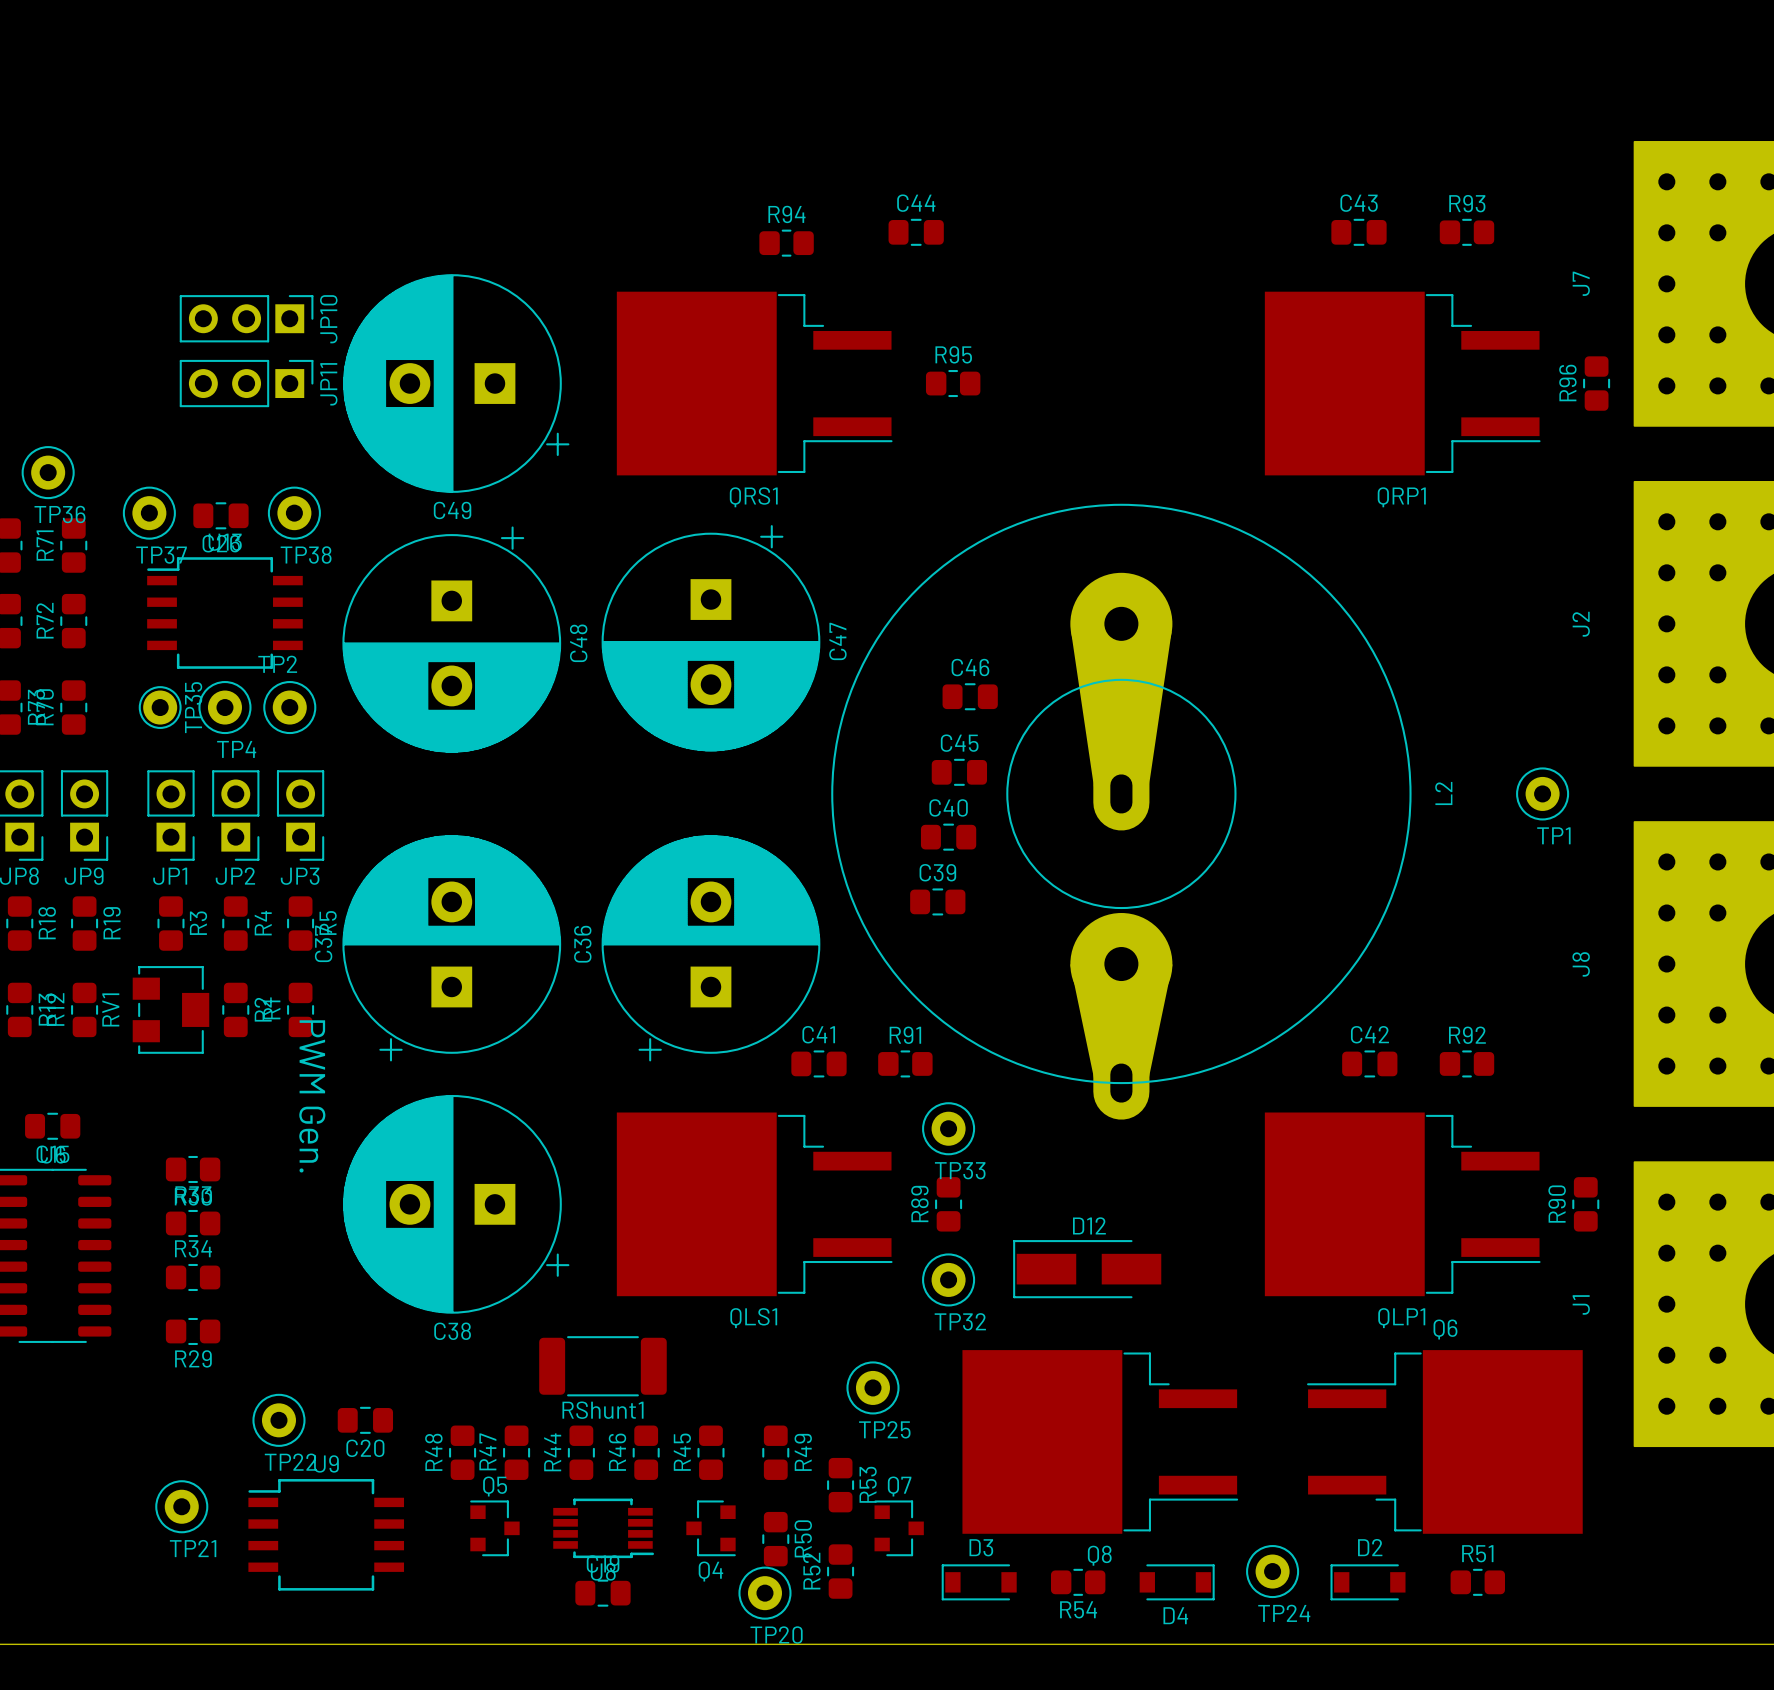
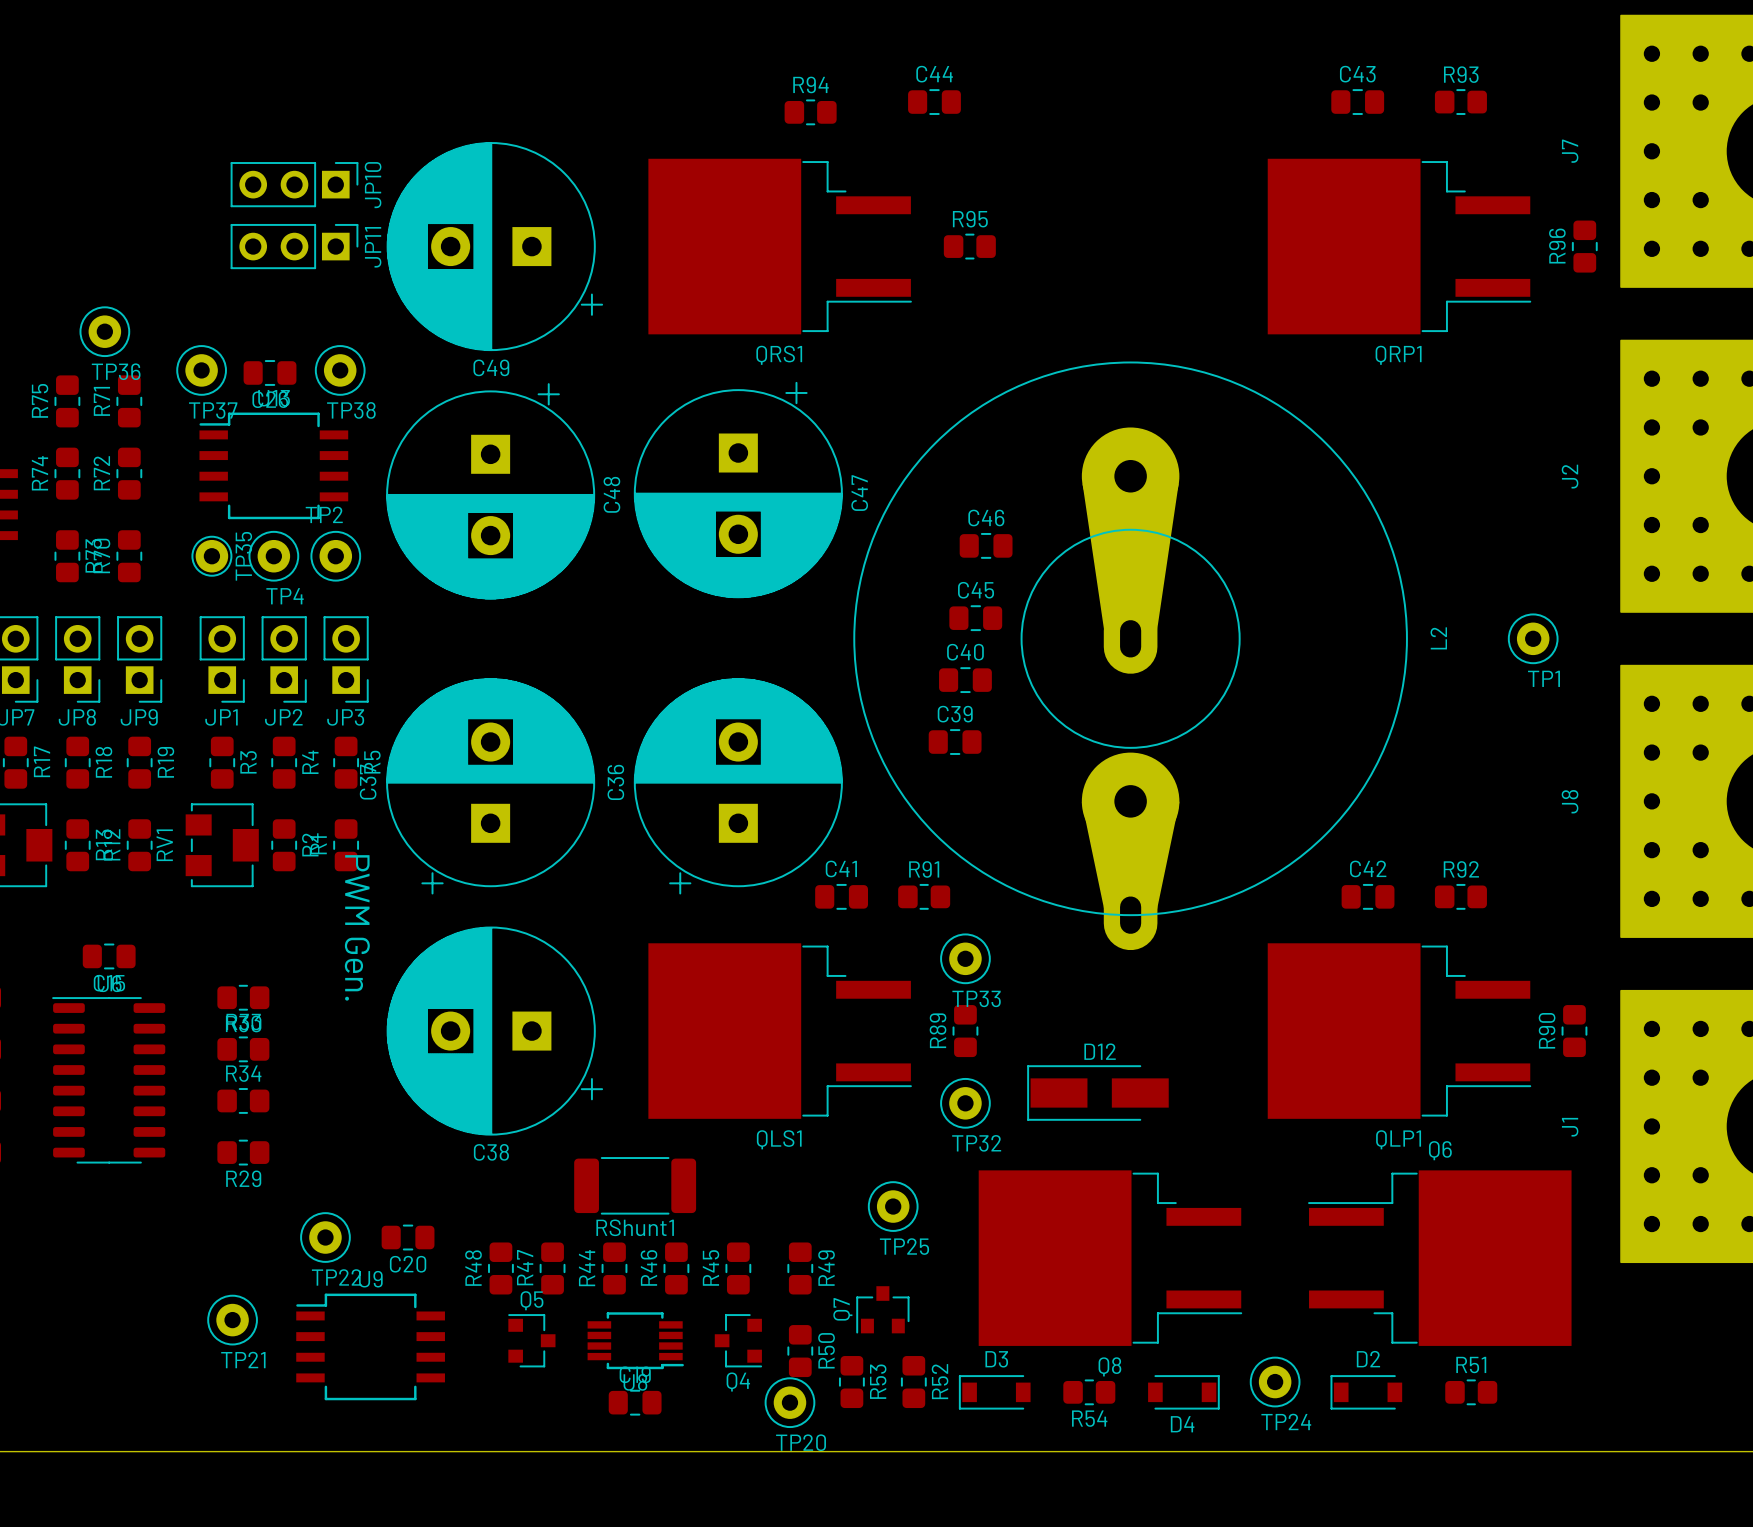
R53 position: (840, 1485) -> (851, 1382)
Q7 rotation: 0° (899, 1528) -> 90° counterclockwise (882, 1309)
Q7 position: (899, 1528) -> (882, 1309)
R52 name position: R52 (811, 1571) -> R52 (940, 1381)
R52 position: (840, 1571) -> (913, 1382)

